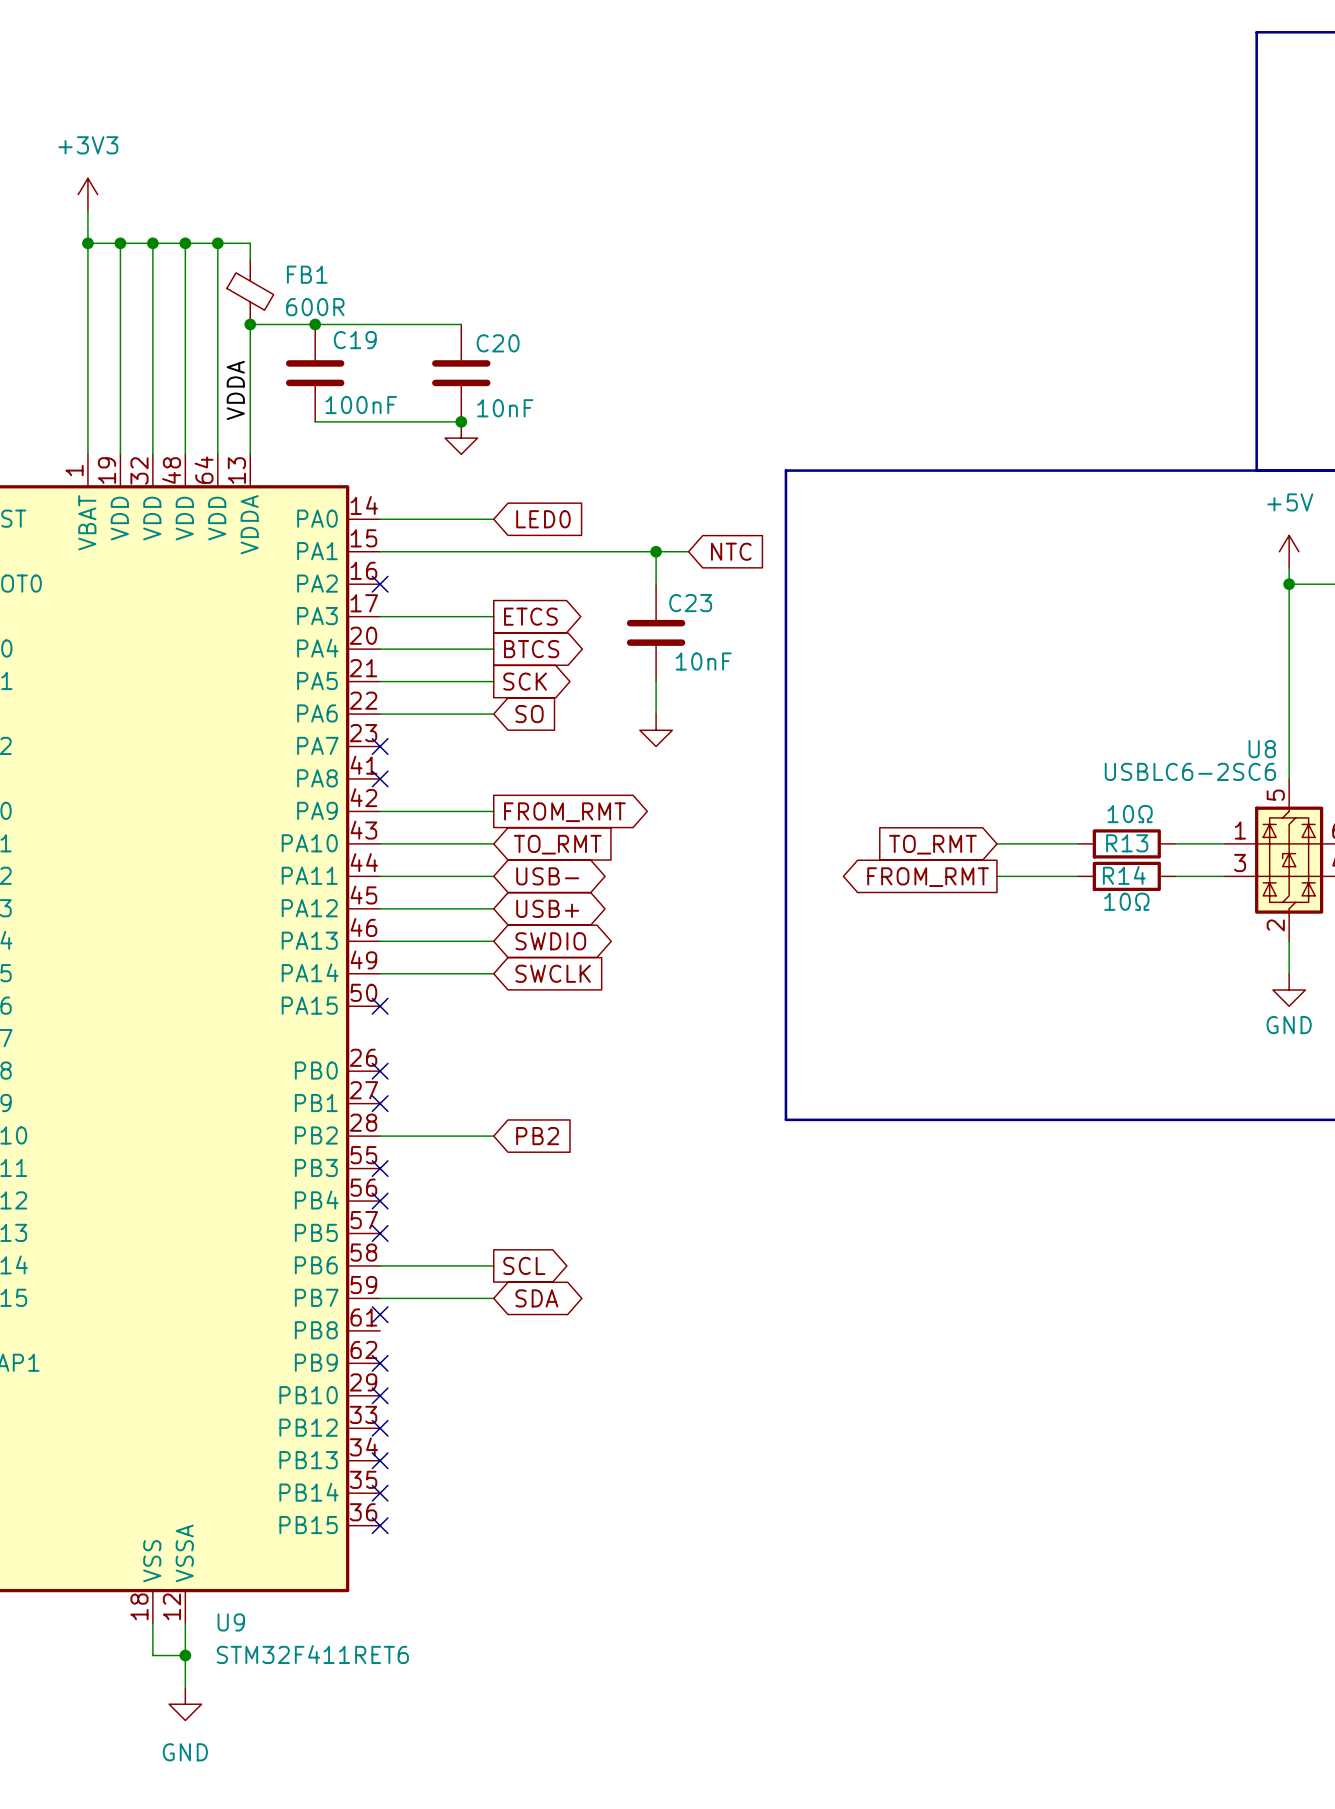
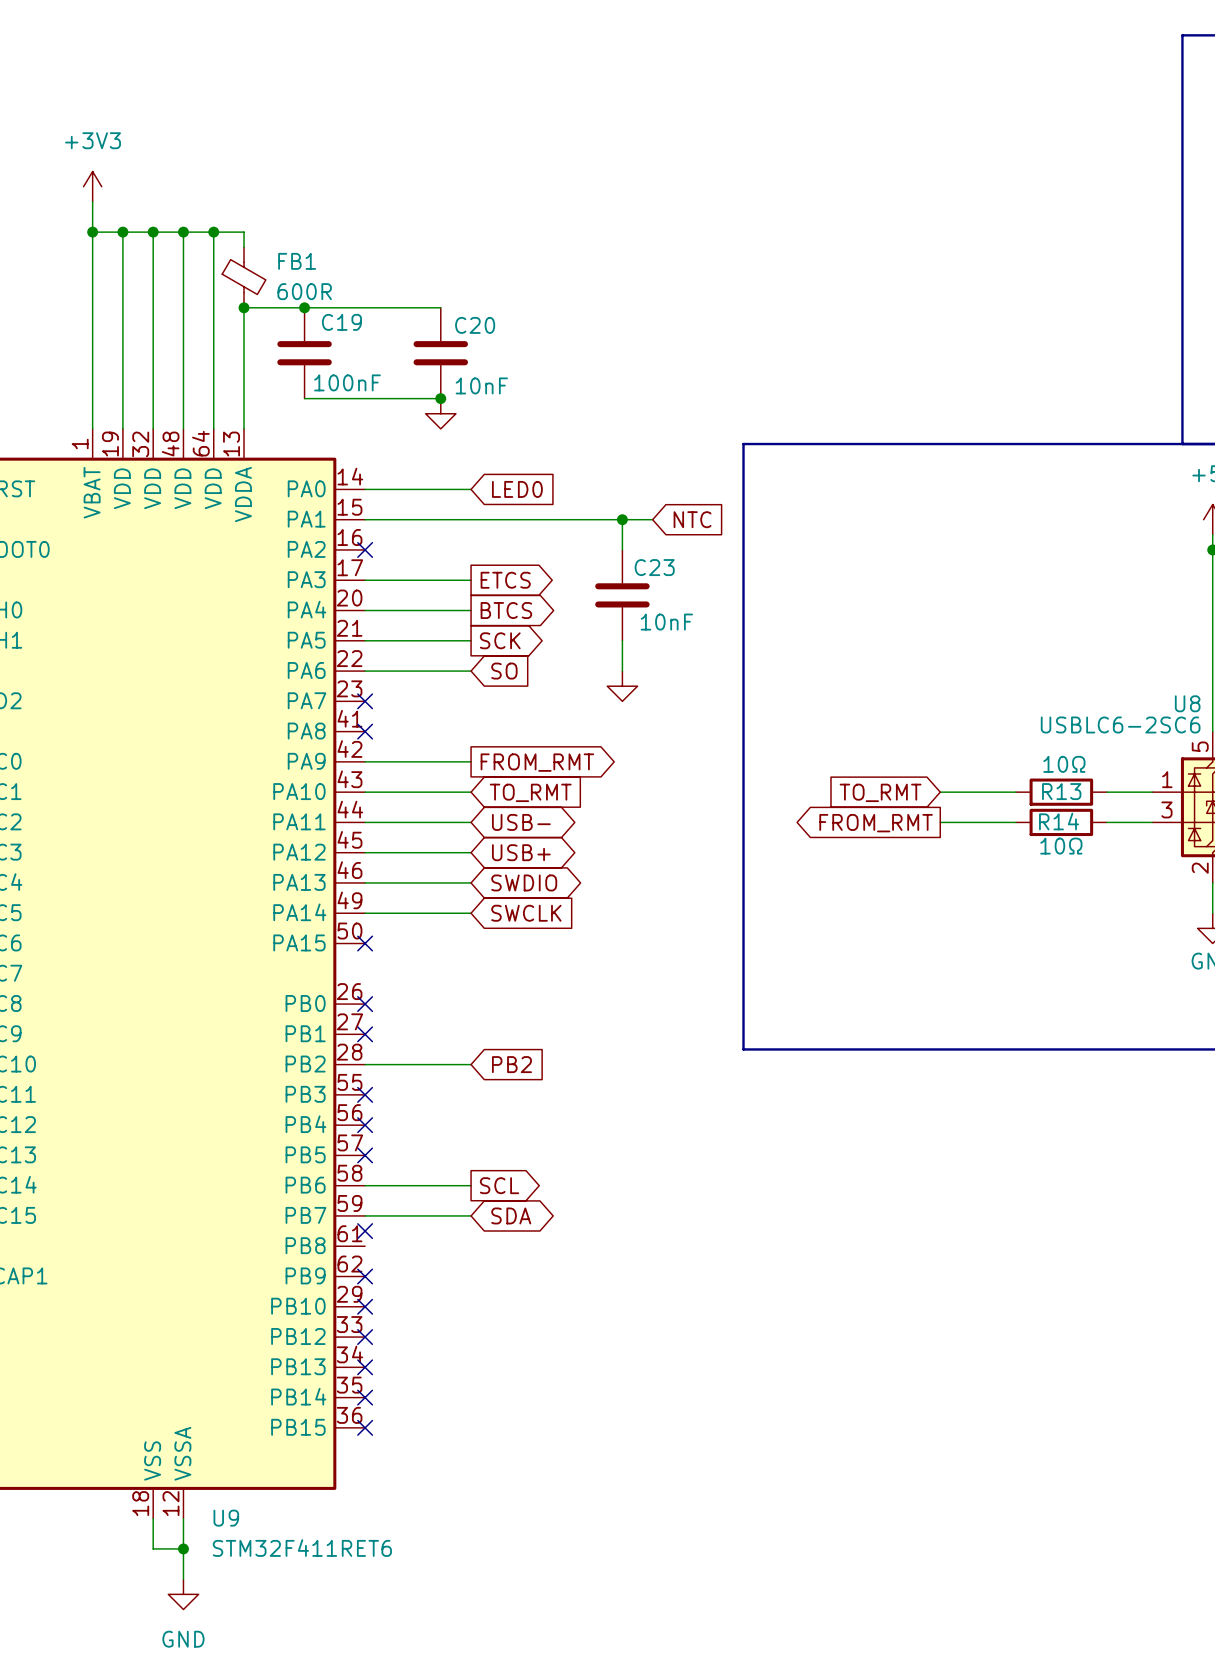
label: VDDA (235, 390) -> none

